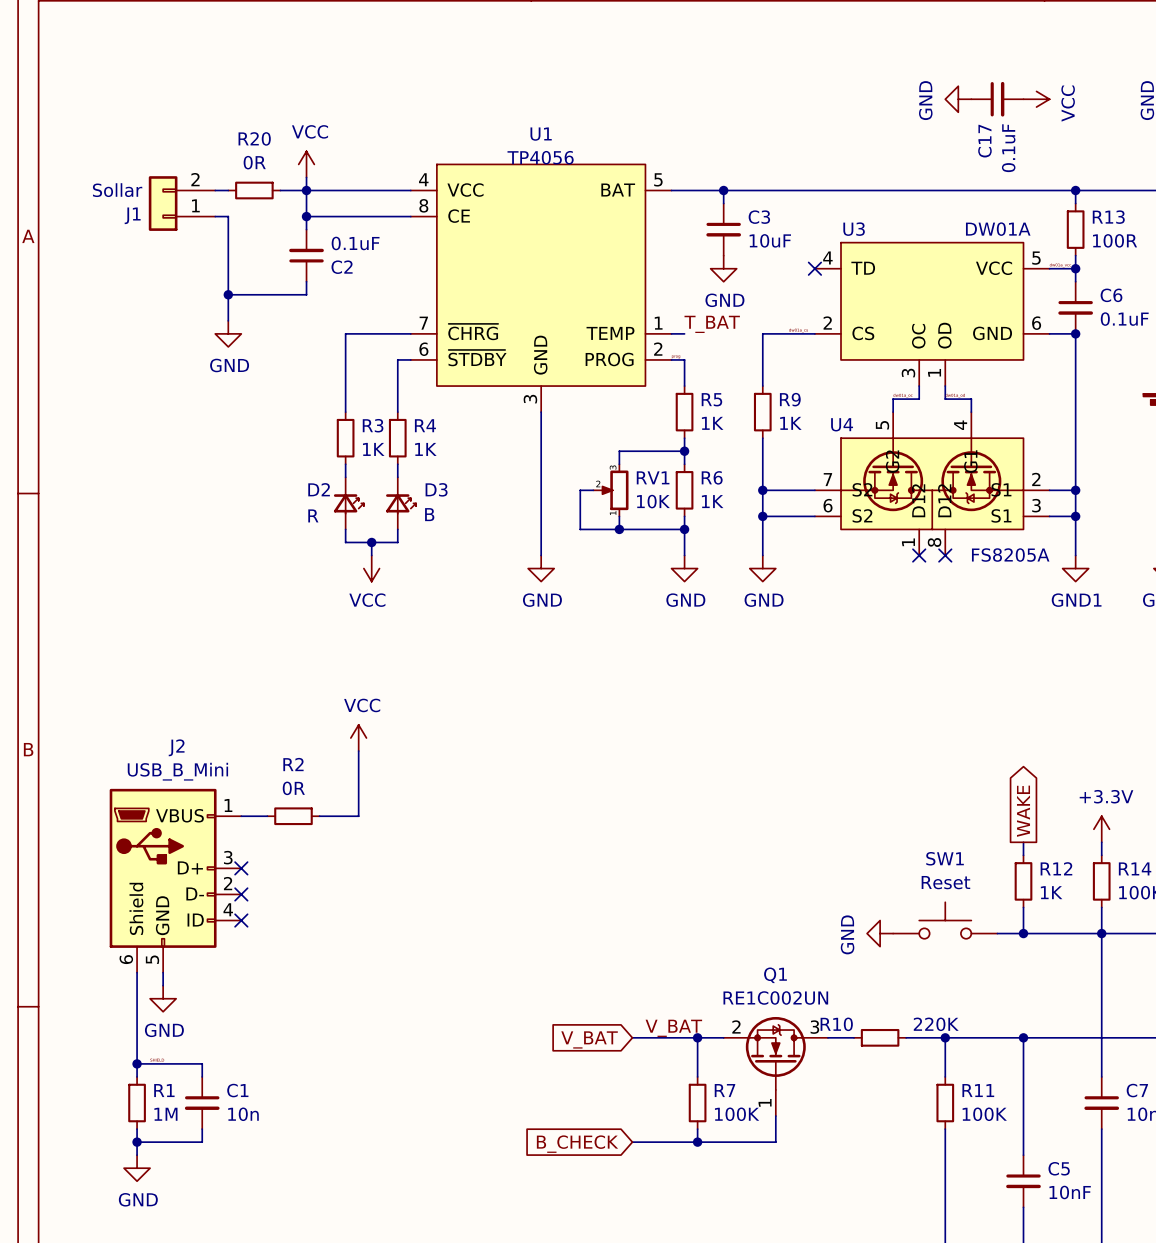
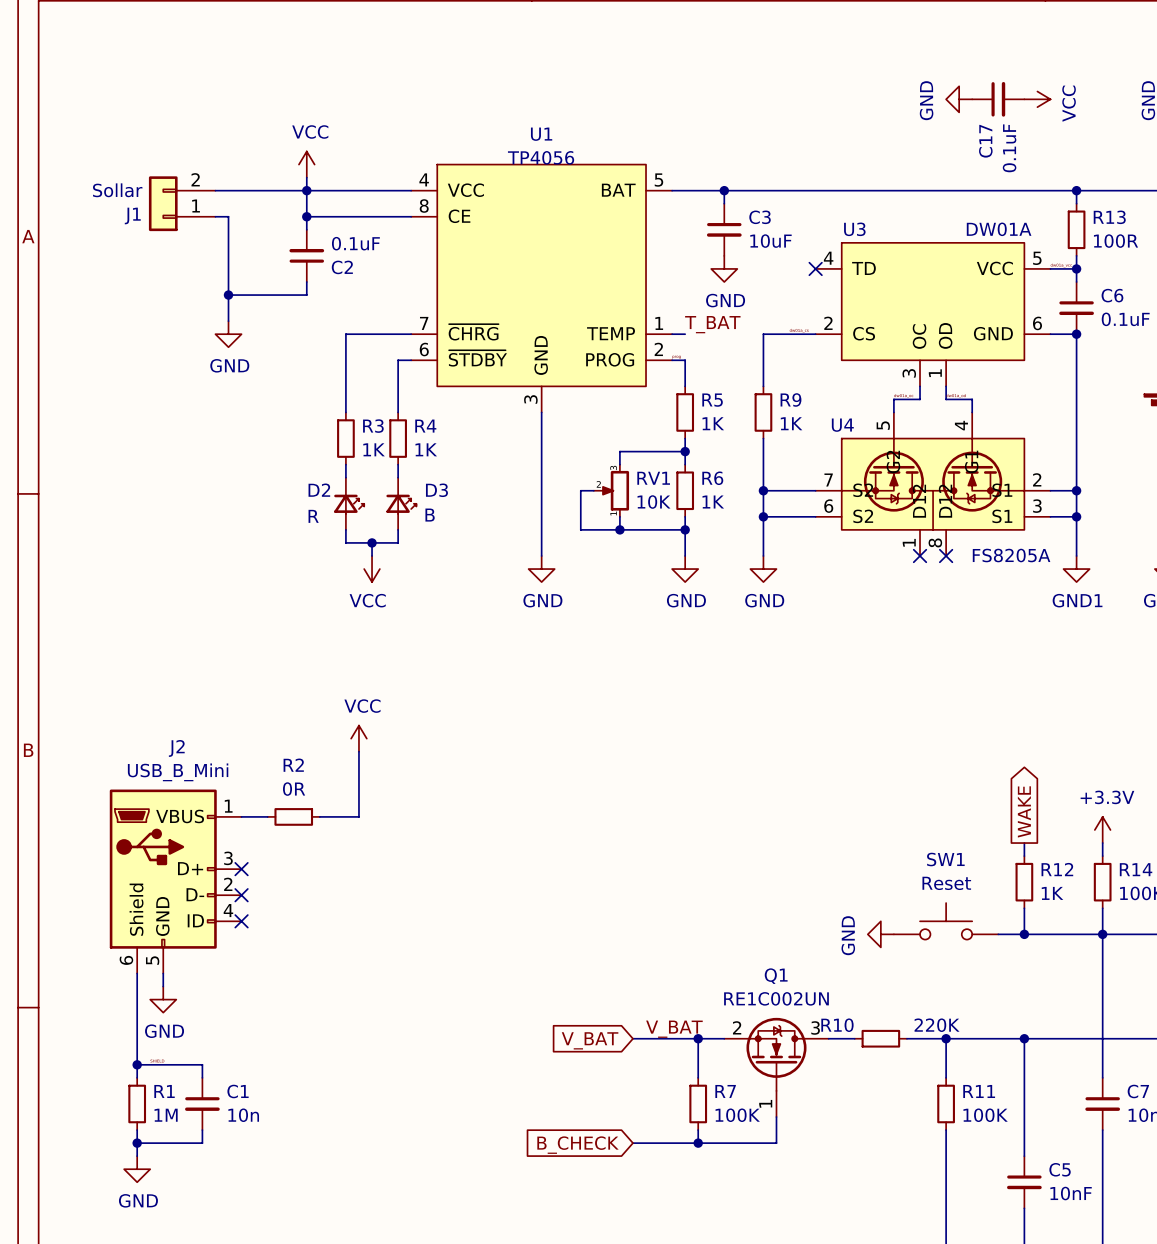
wire: none -> (228, 190) (280, 190)
R20: 0R (254, 190) -> none

